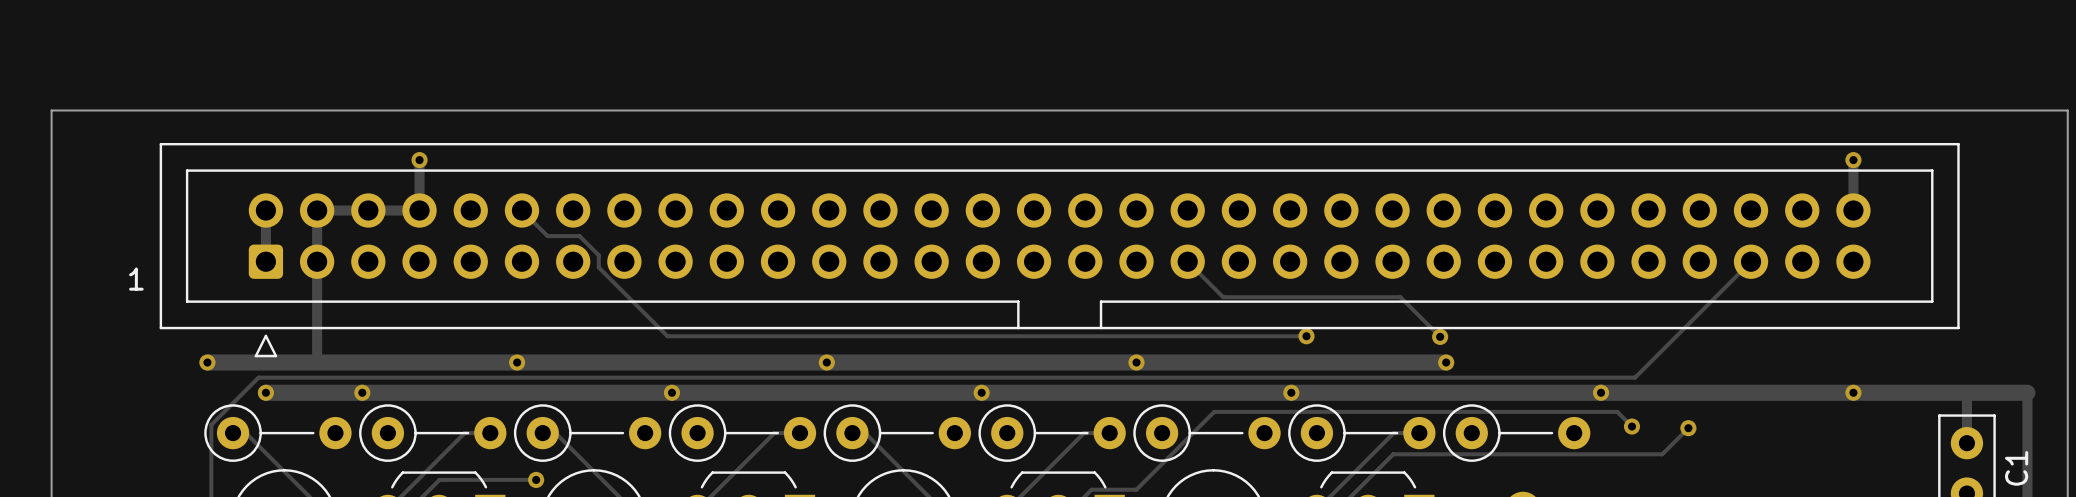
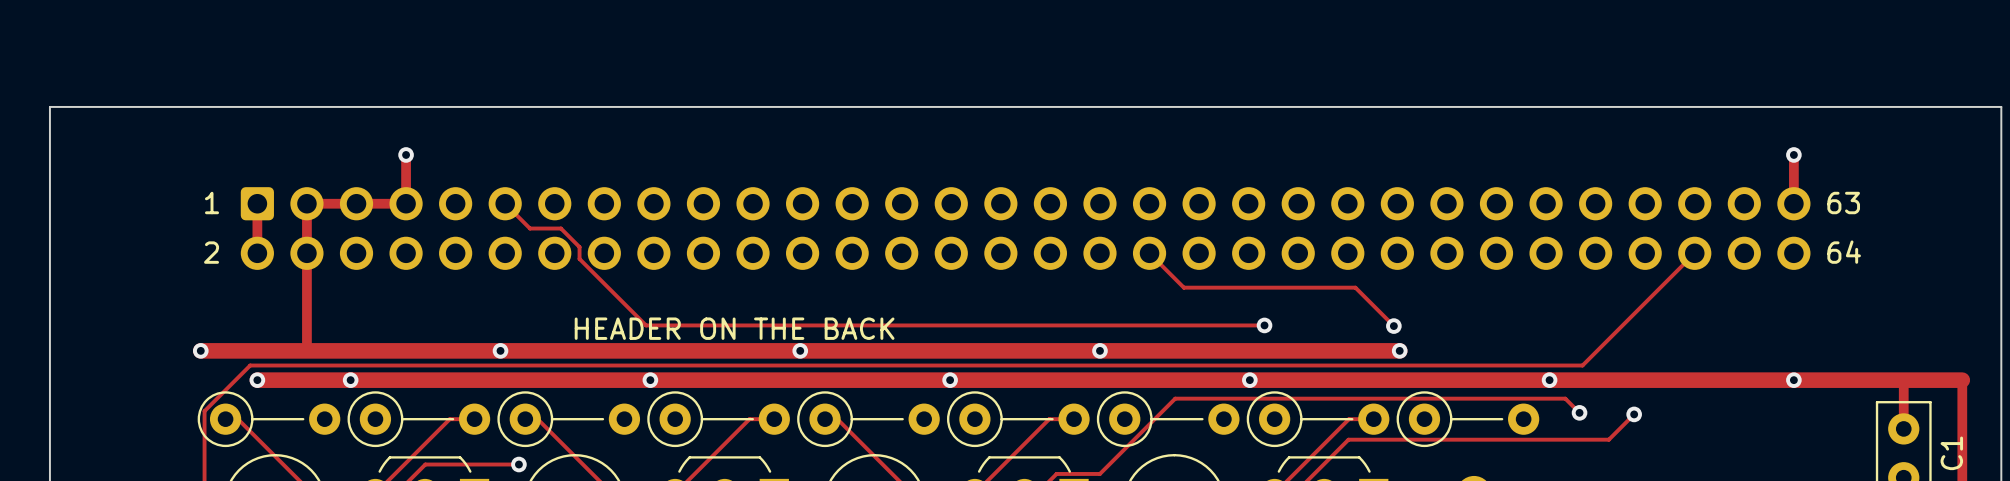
text: none -> 63 (1843, 203)
part side: top (1059, 250) -> bottom (1025, 228)
text: none -> 2 (211, 252)
text: none -> 64 (1844, 252)
text position: 1 (136, 279) -> 1 (212, 203)
text: none -> HEADER ON THE BACK (734, 328)

